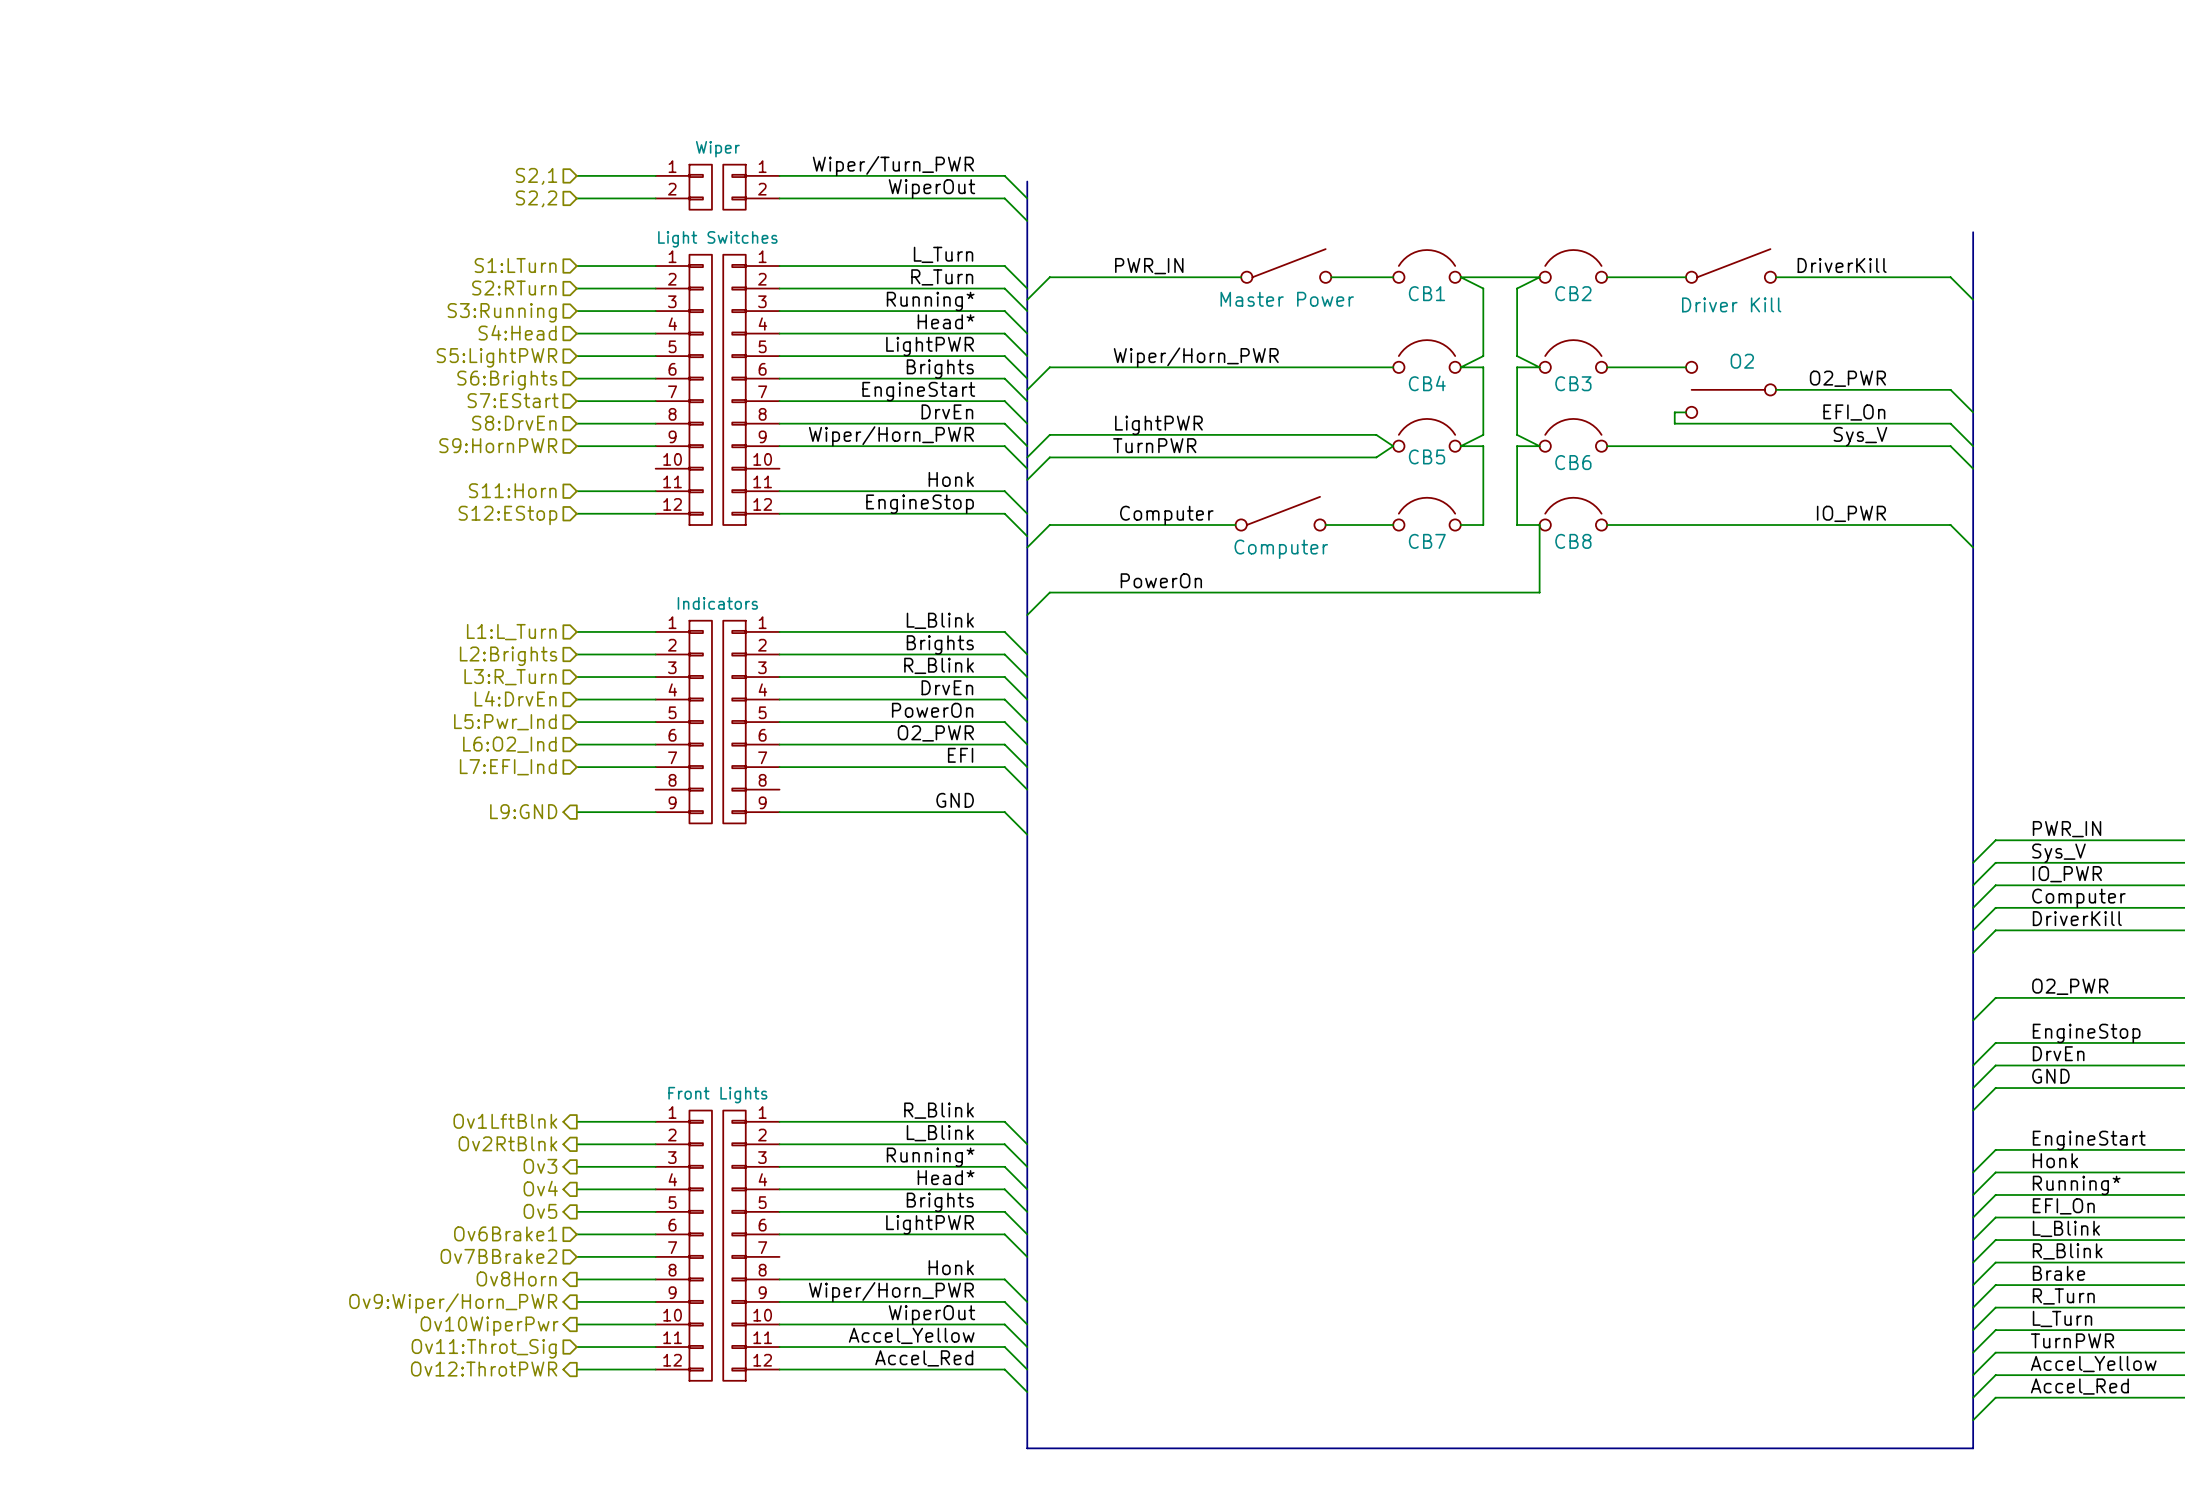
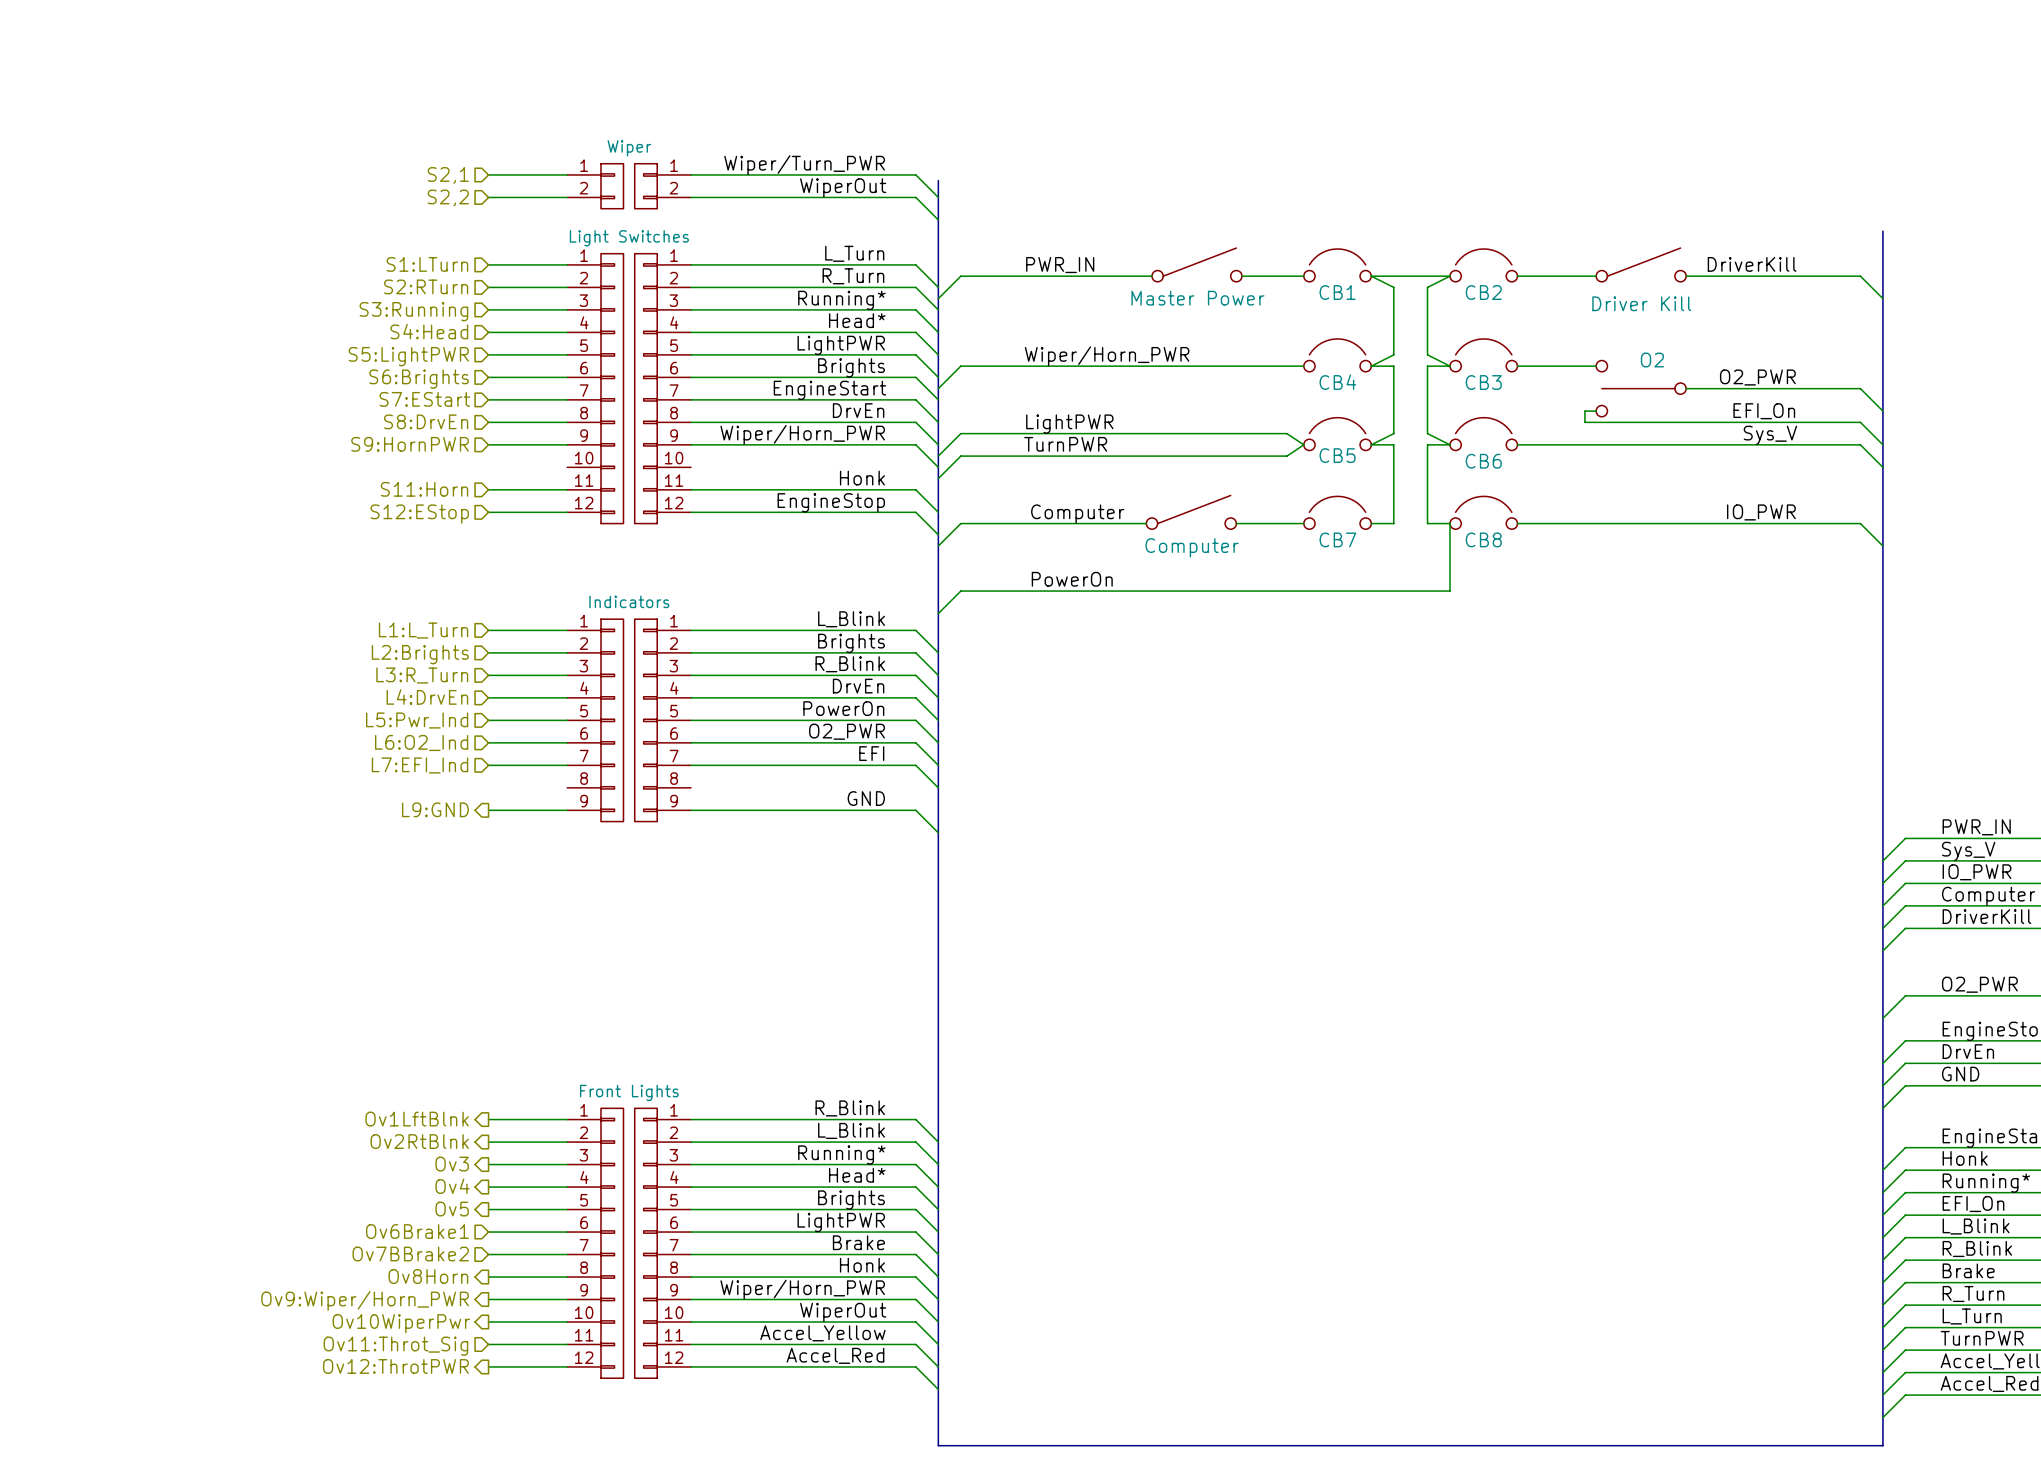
label: none -> Brake (858, 1242)
wire: none -> (690, 1254) (915, 1254) (938, 1277)

